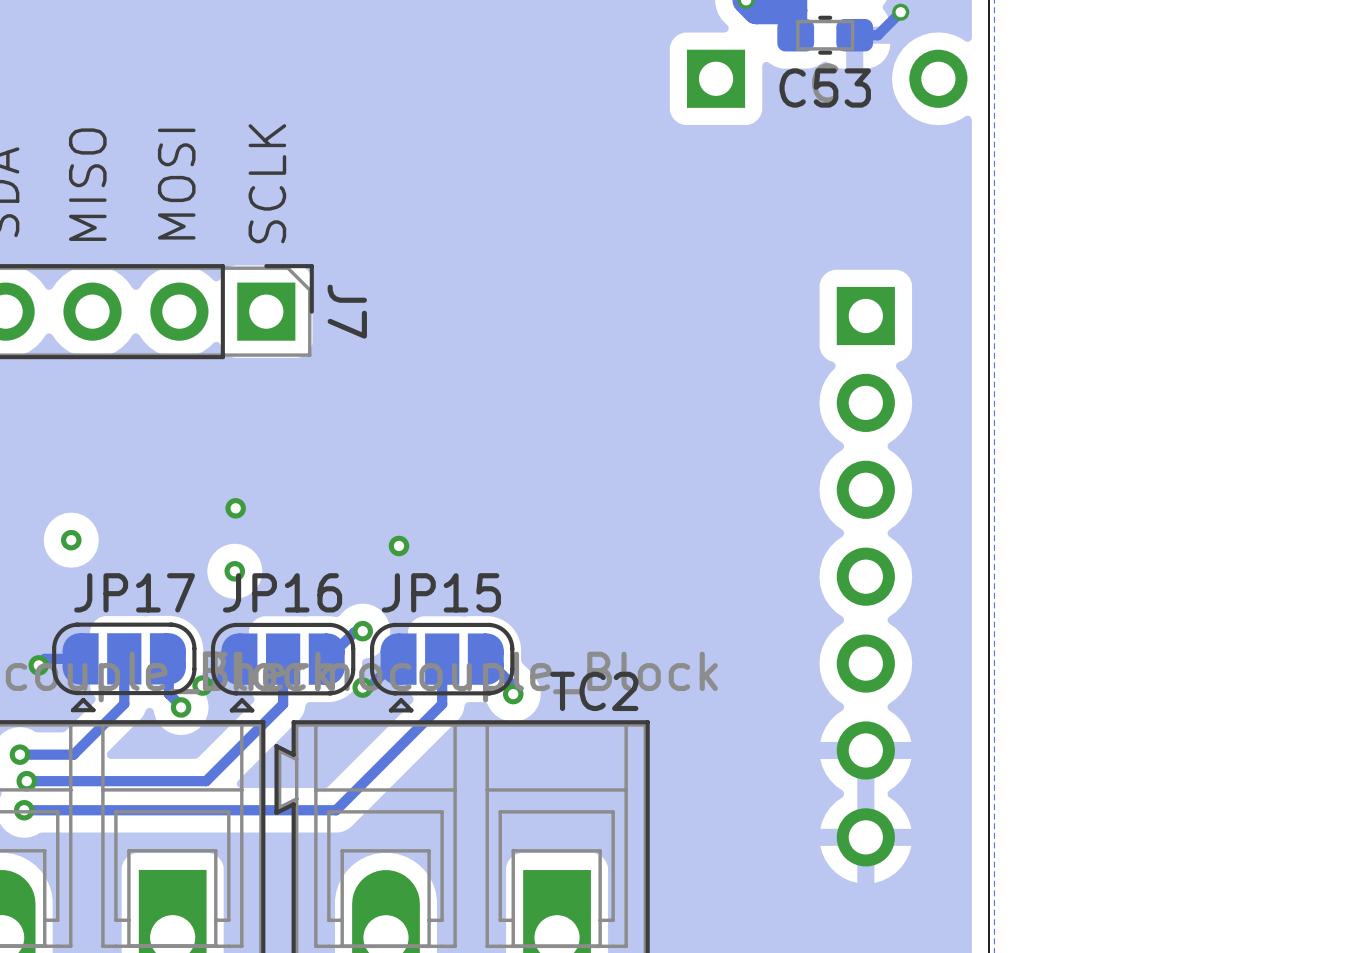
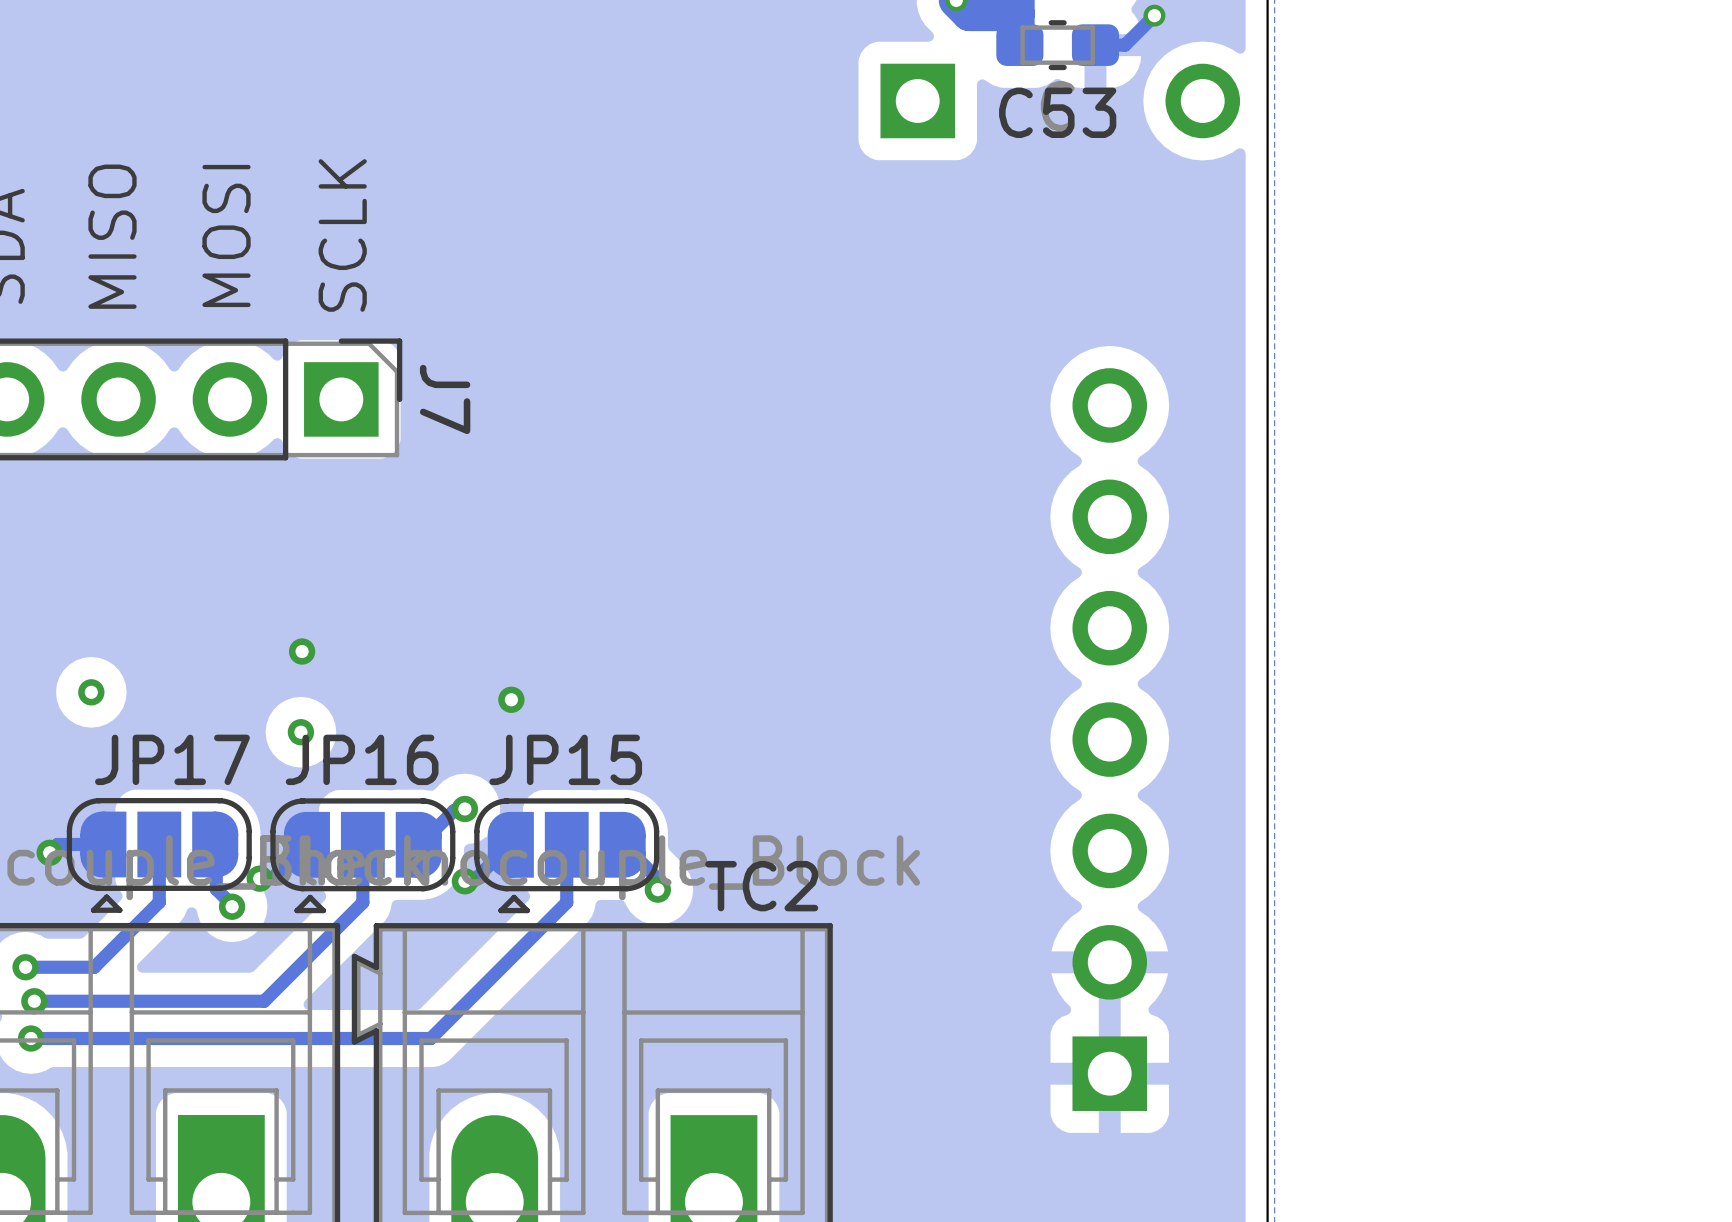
part rotation: 0° (865, 576) -> 180° (1109, 739)

